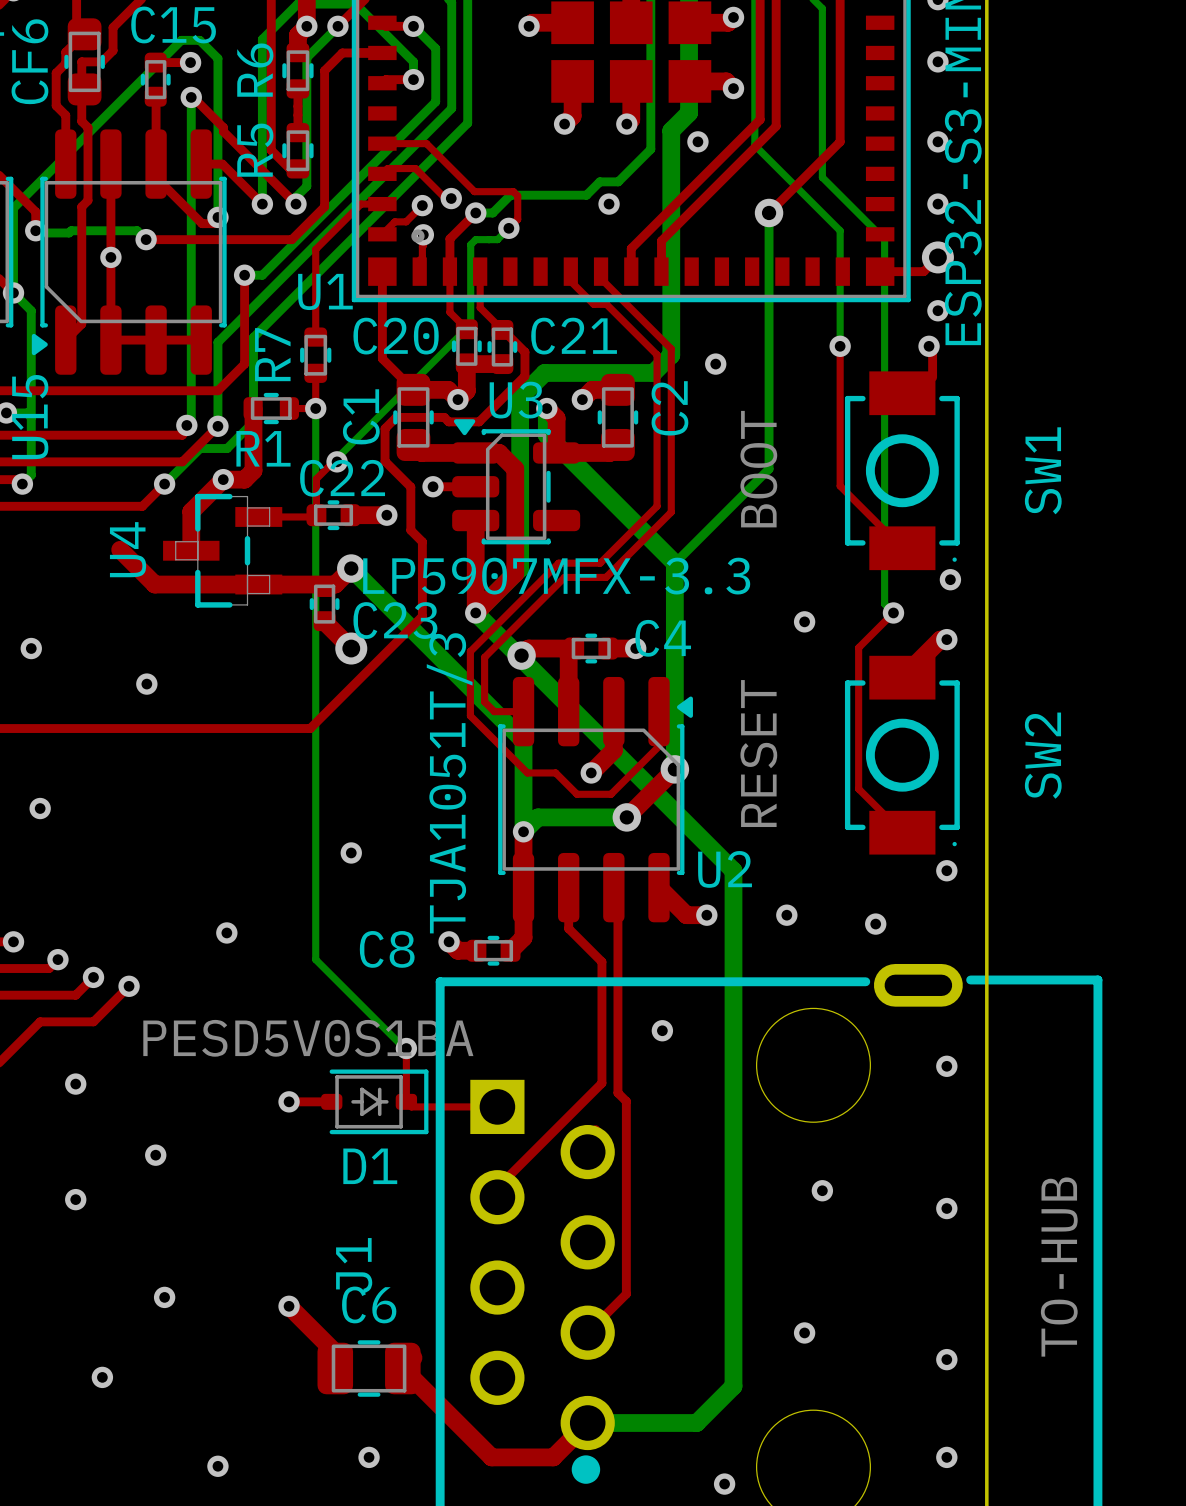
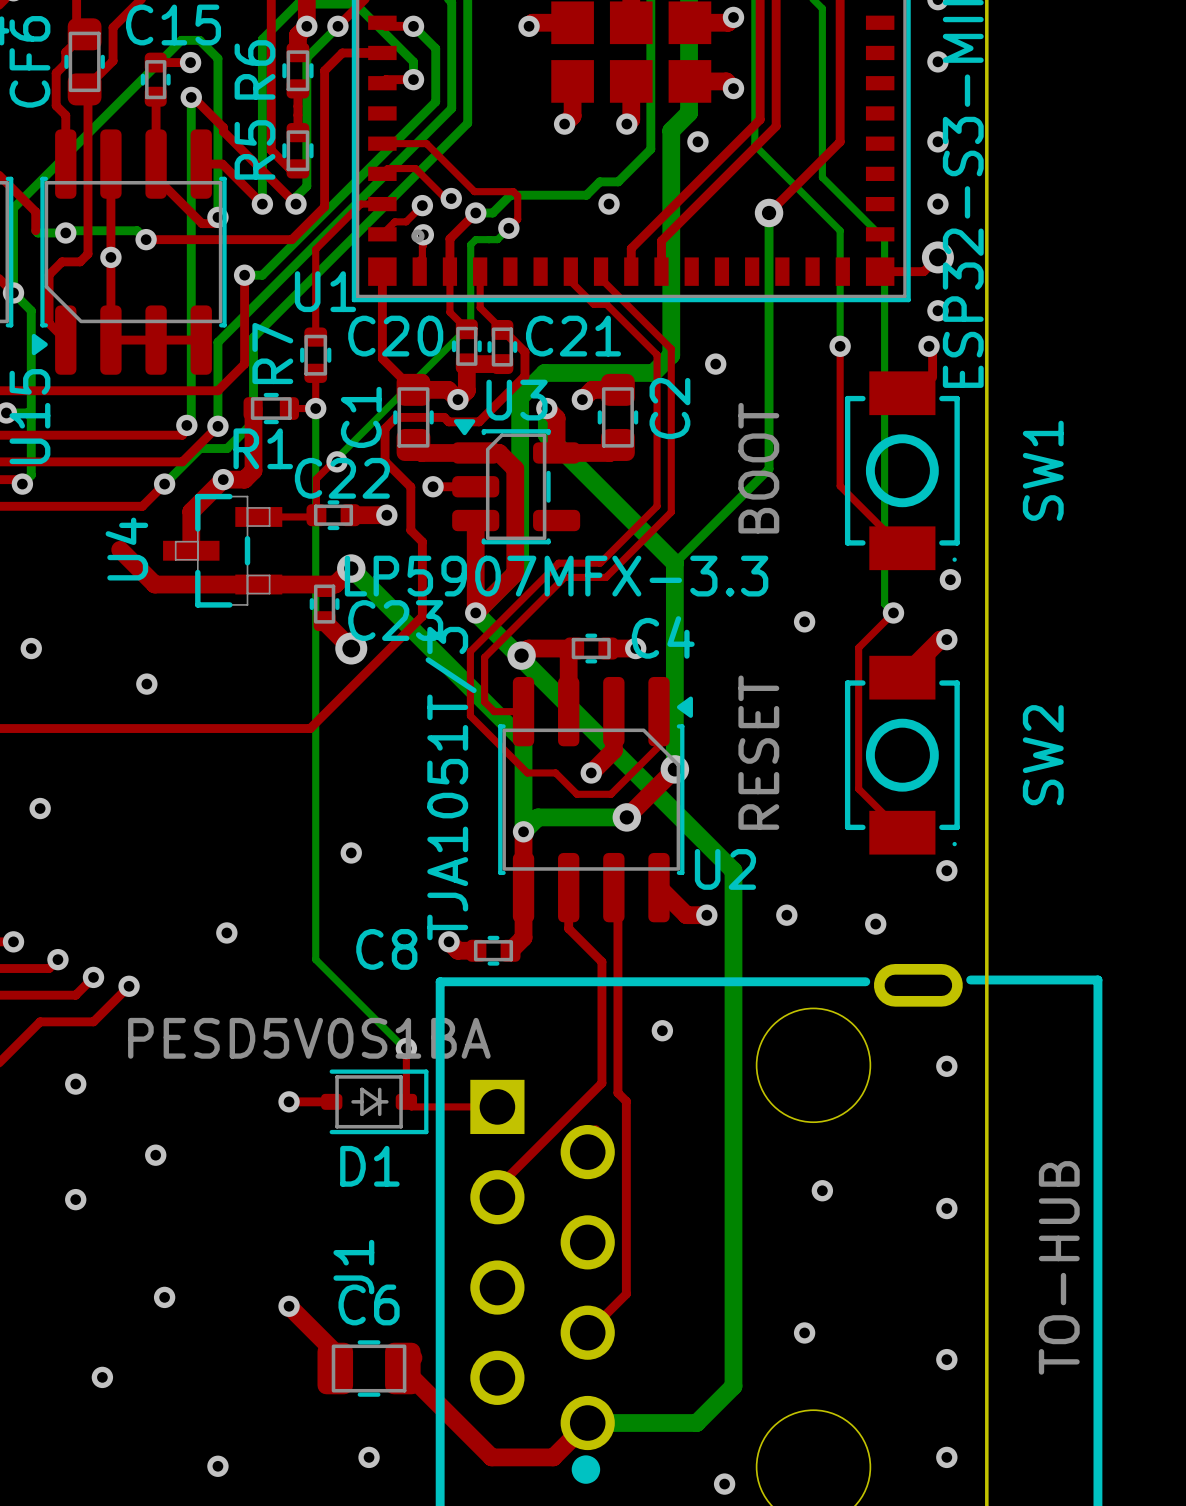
top track: (113, 50) (101, 61) (81, 61) (81, 121) (87, 127) -> (113, 50) (113, 60) (84, 89) (87, 92) (87, 127)
top track: (87, 200) (81, 206) (81, 324) (65, 340) -> (87, 200) (87, 254) (80, 261) (62, 261) (49, 274) (49, 323) (65, 340)
via position: (35, 230) -> (65, 232)

